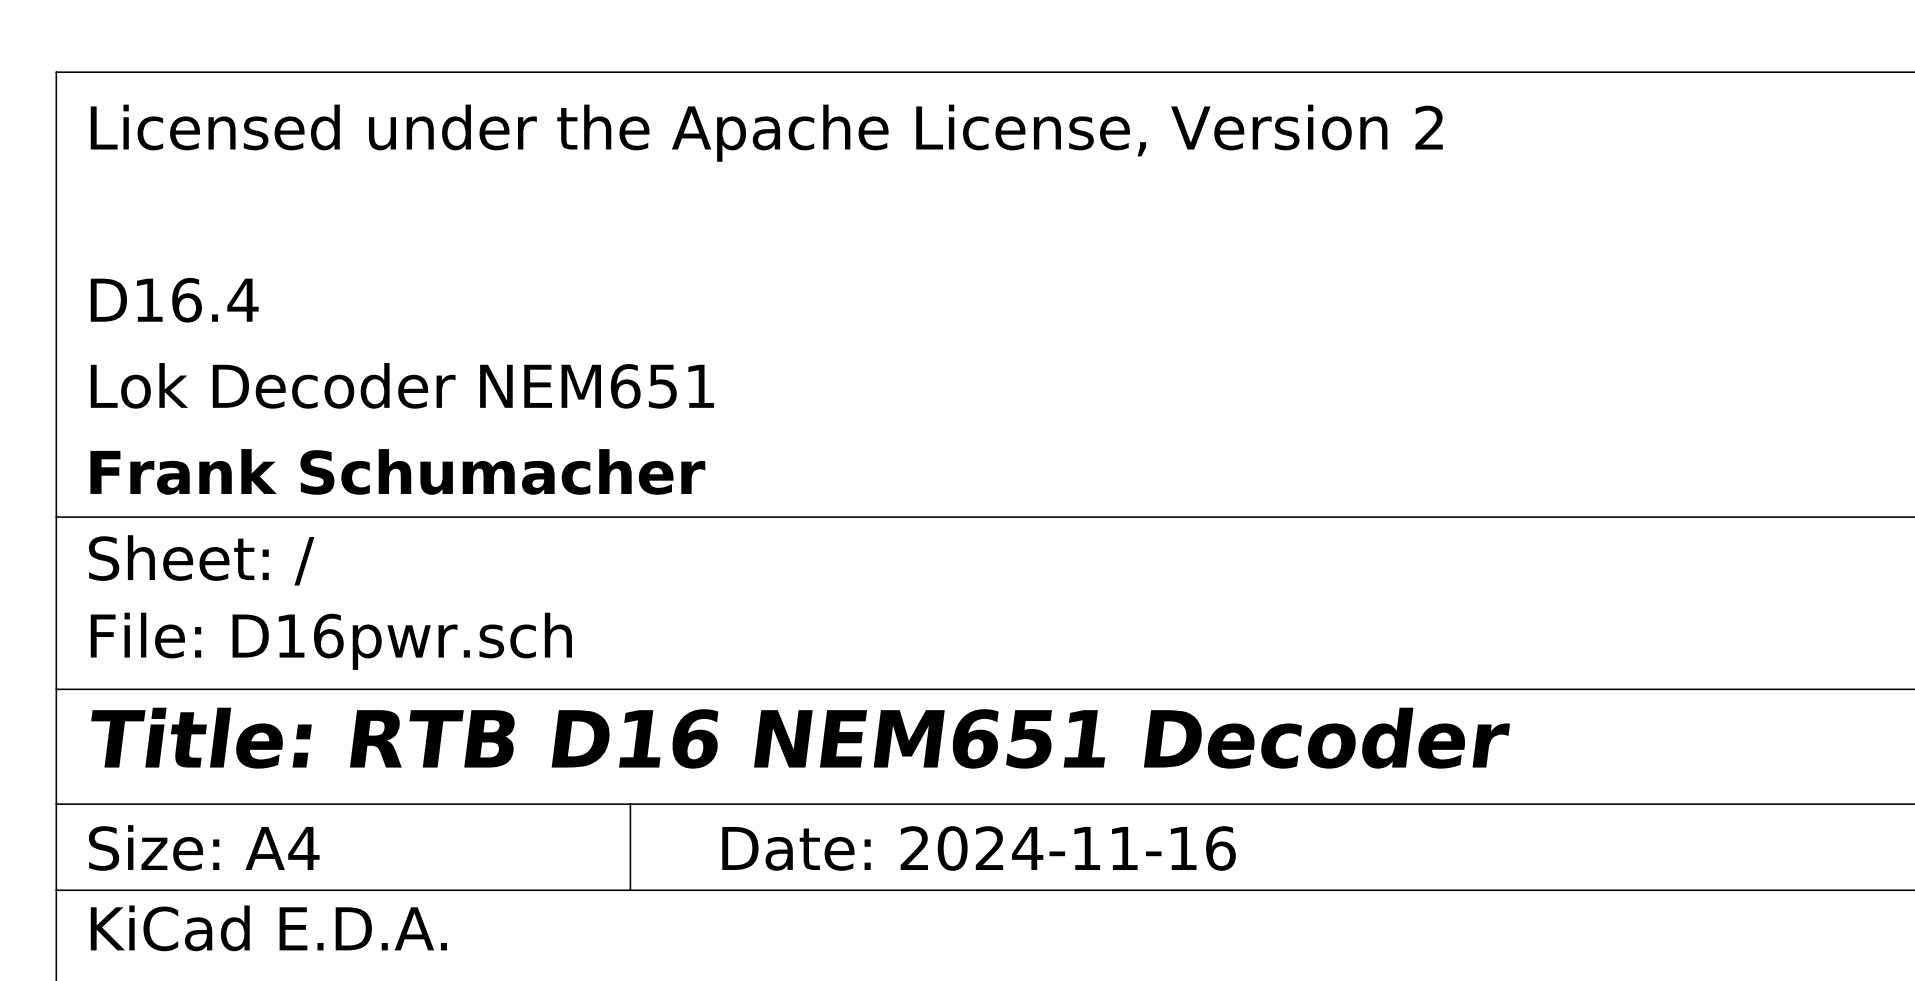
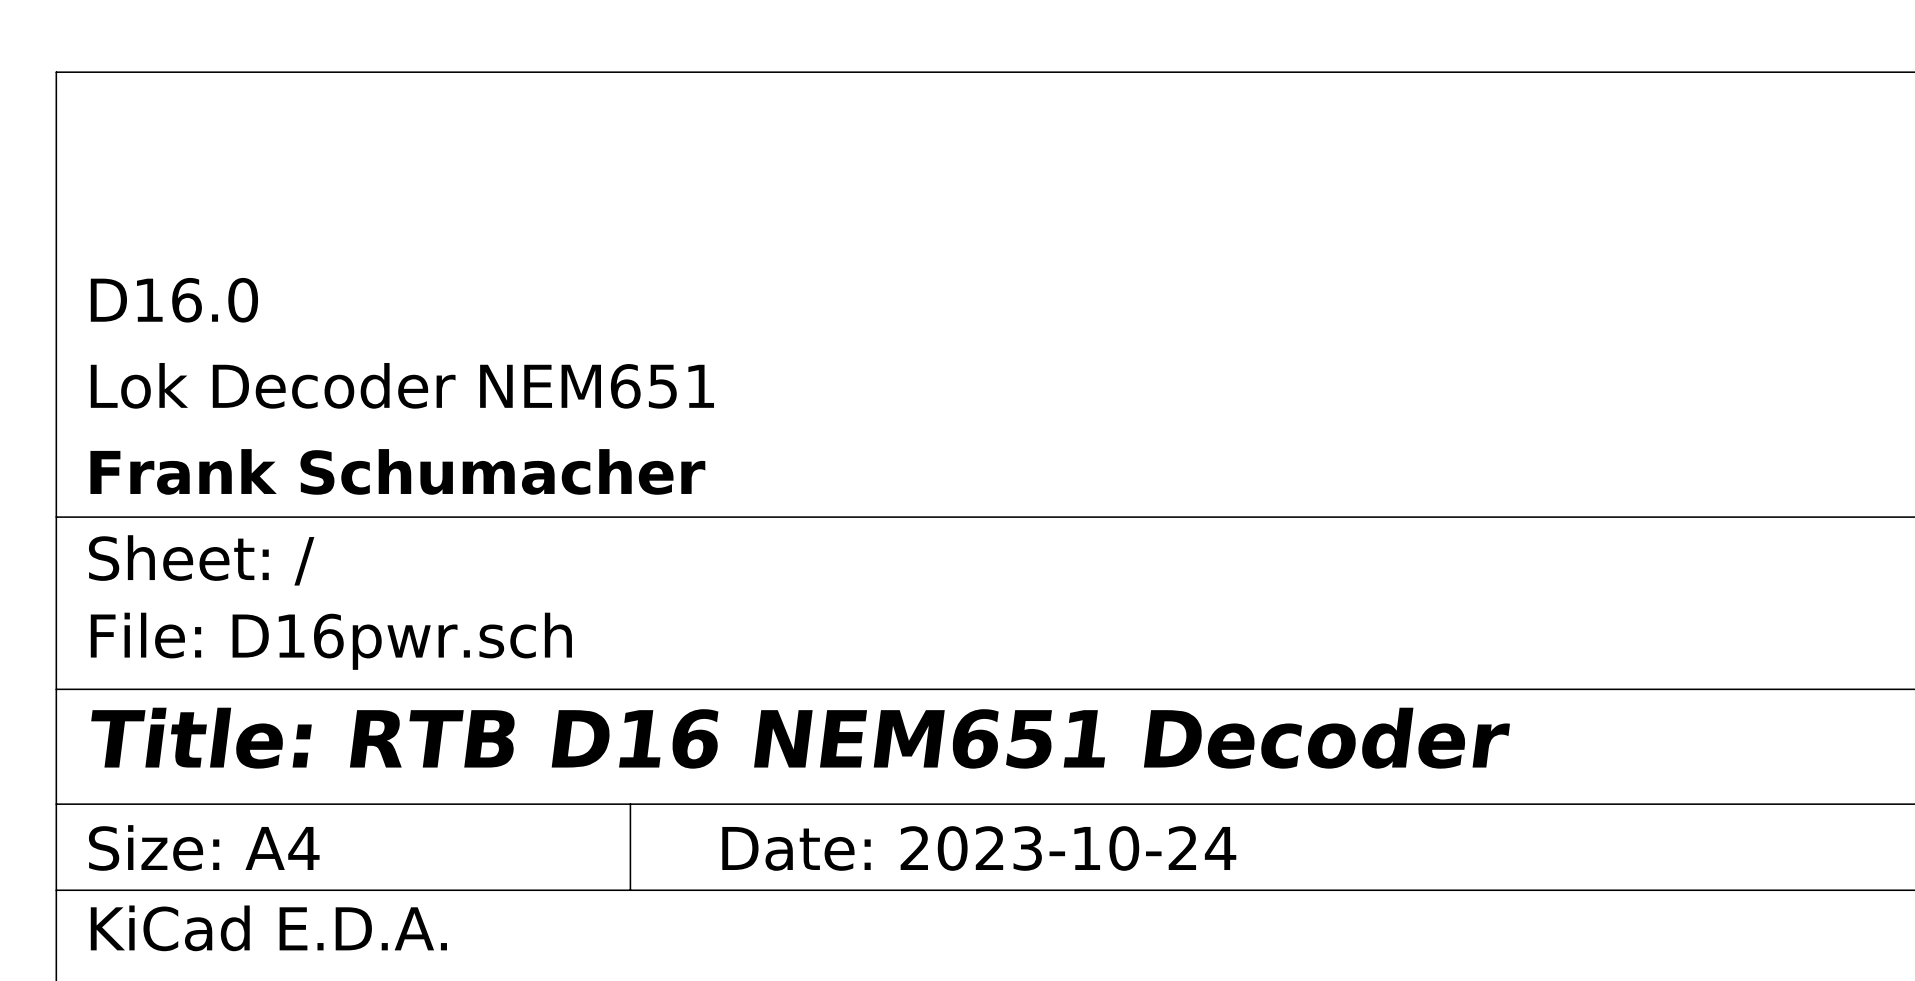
title block: Licensed under the Apache License, Version 2 (766, 133) -> none
title block: D16.4 (174, 300) -> D16.0 (174, 300)
title block: Date: 2024-11-16 (979, 848) -> Date: 2023-10-24 (979, 848)

